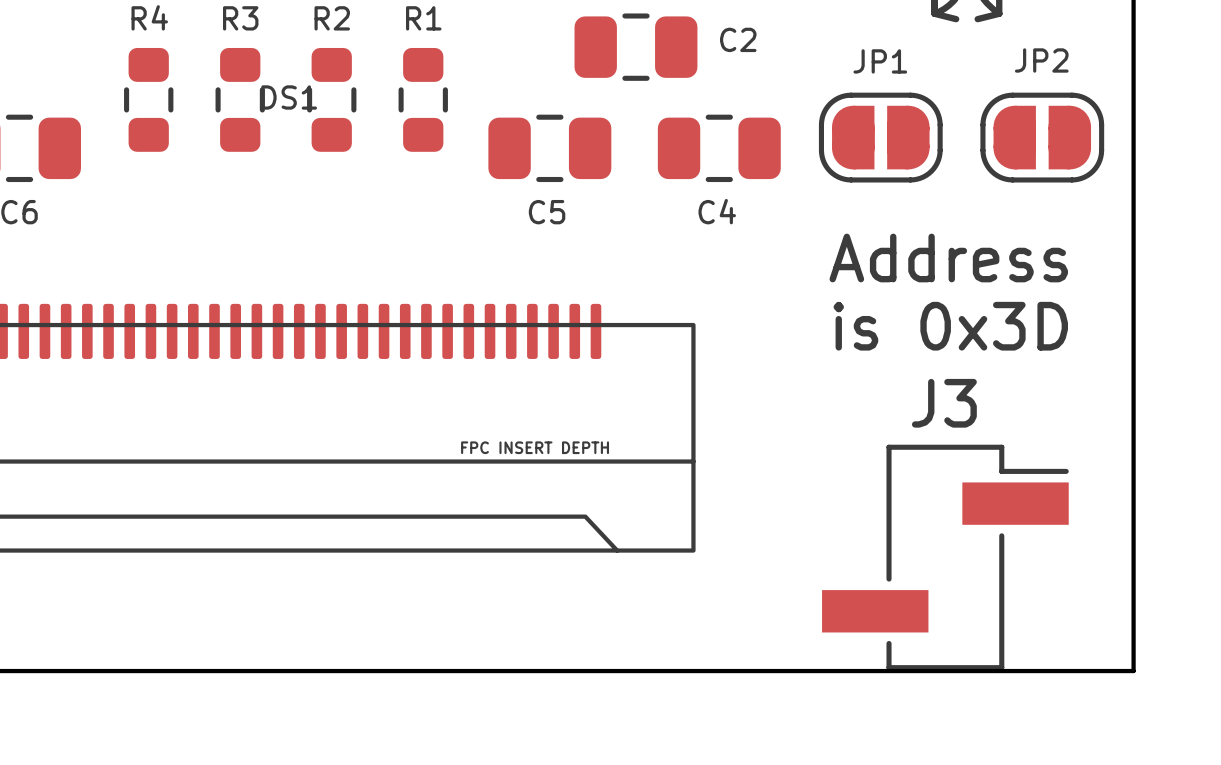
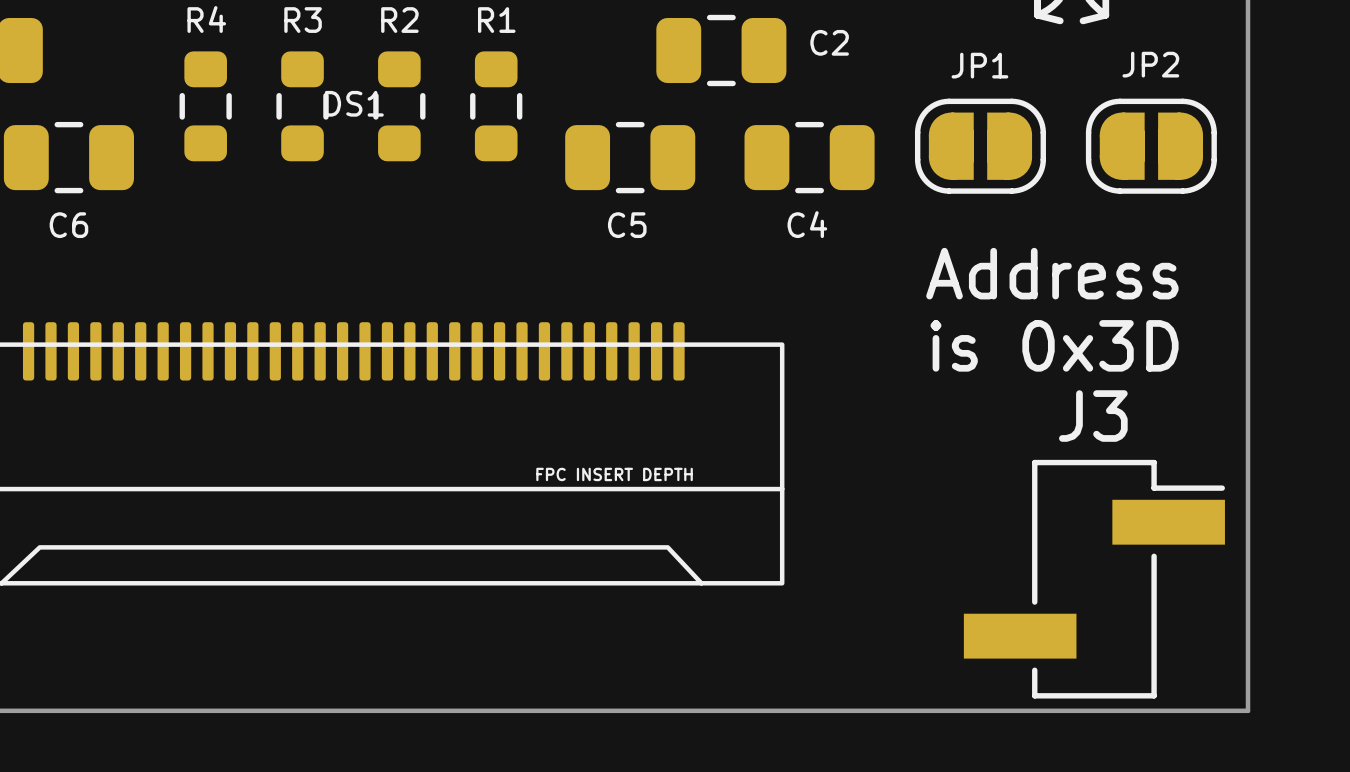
J3 position: (945, 557) -> (1094, 579)

